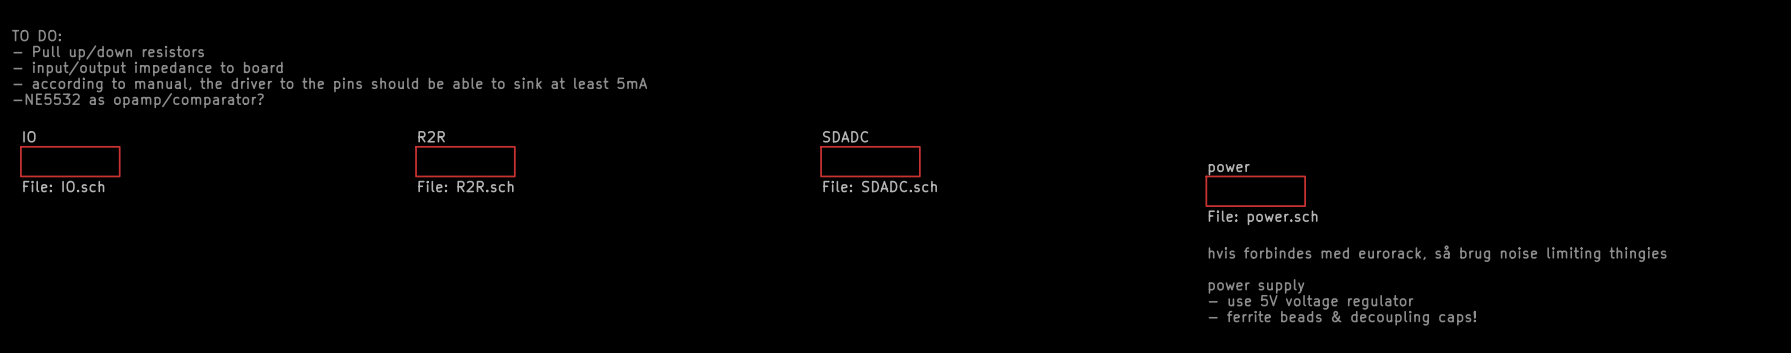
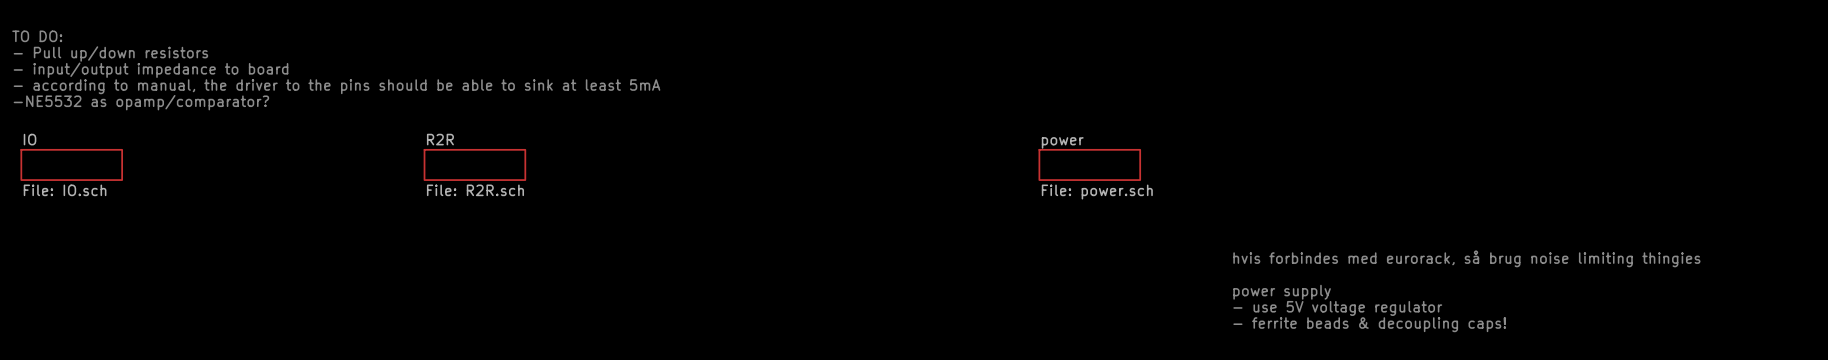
sheet SDADC: File: SDADC.sch (870, 161) -> none
sheet power position: (1255, 191) -> (1089, 164)

